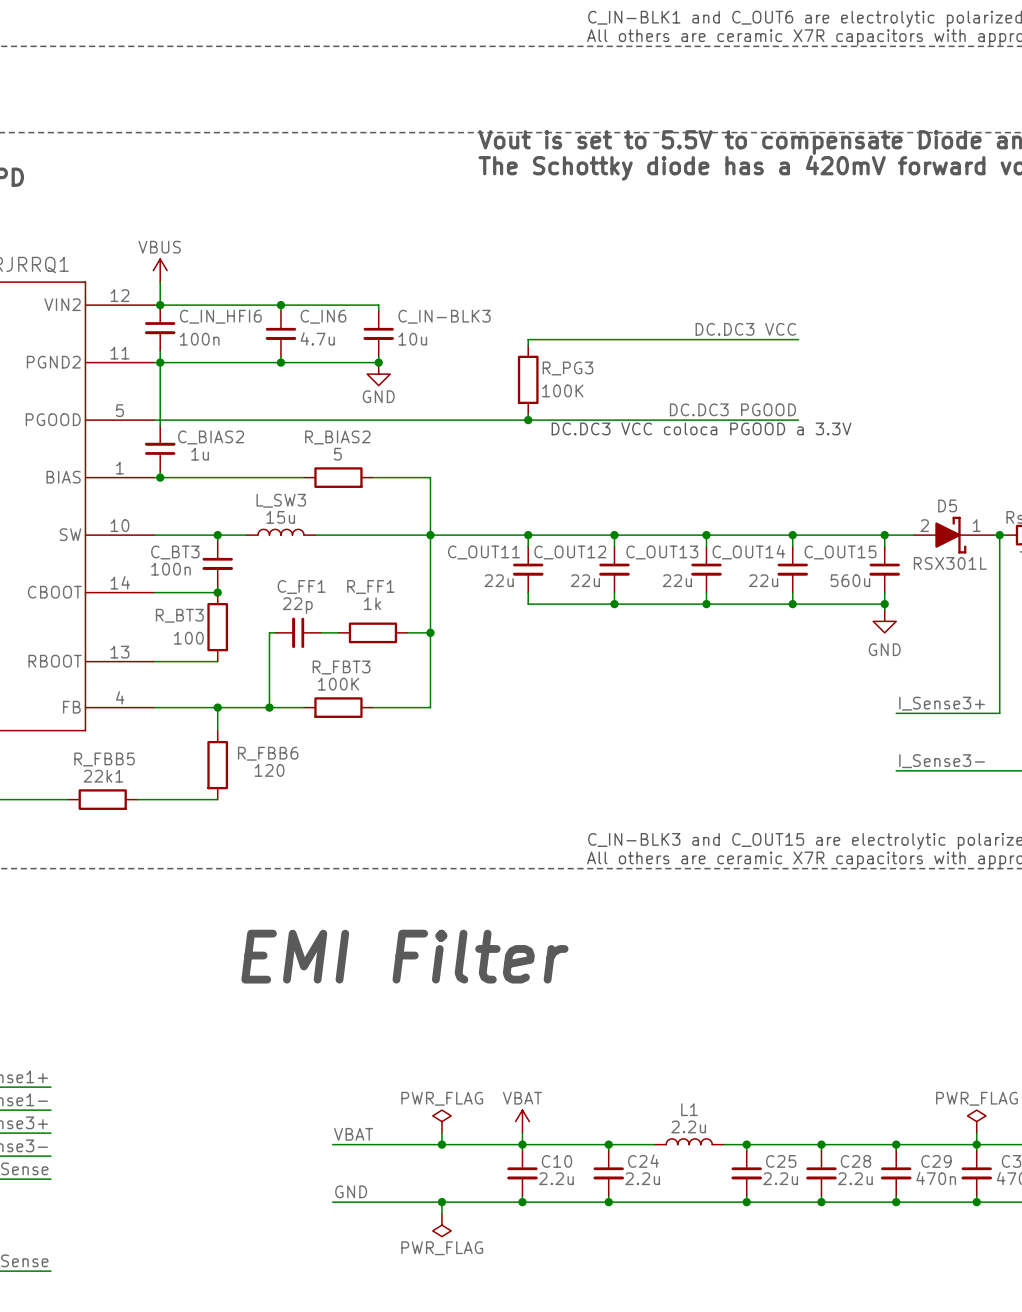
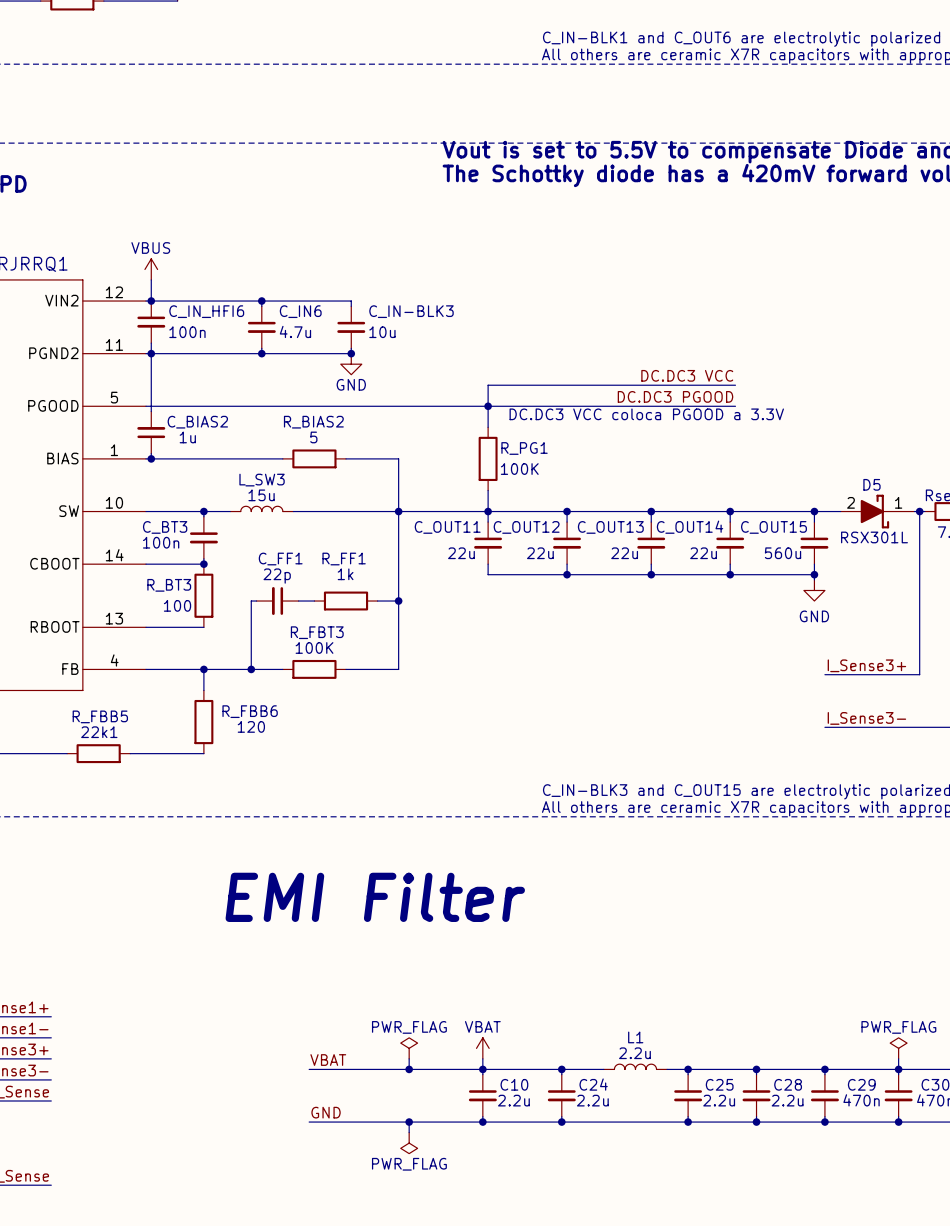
label position: DC.DC3 VCC (745, 329) -> DC.DC3 VCC (687, 375)
wire: (798, 339) (528, 339) (528, 345) -> none
R_PG3: 100K (528, 379) -> none
wire: none -> (735, 385) (488, 385) (488, 401)
wire: none -> (488, 406) (488, 427)
R_PG1: none -> 100K (488, 458)
wire: none -> (488, 490) (488, 511)

